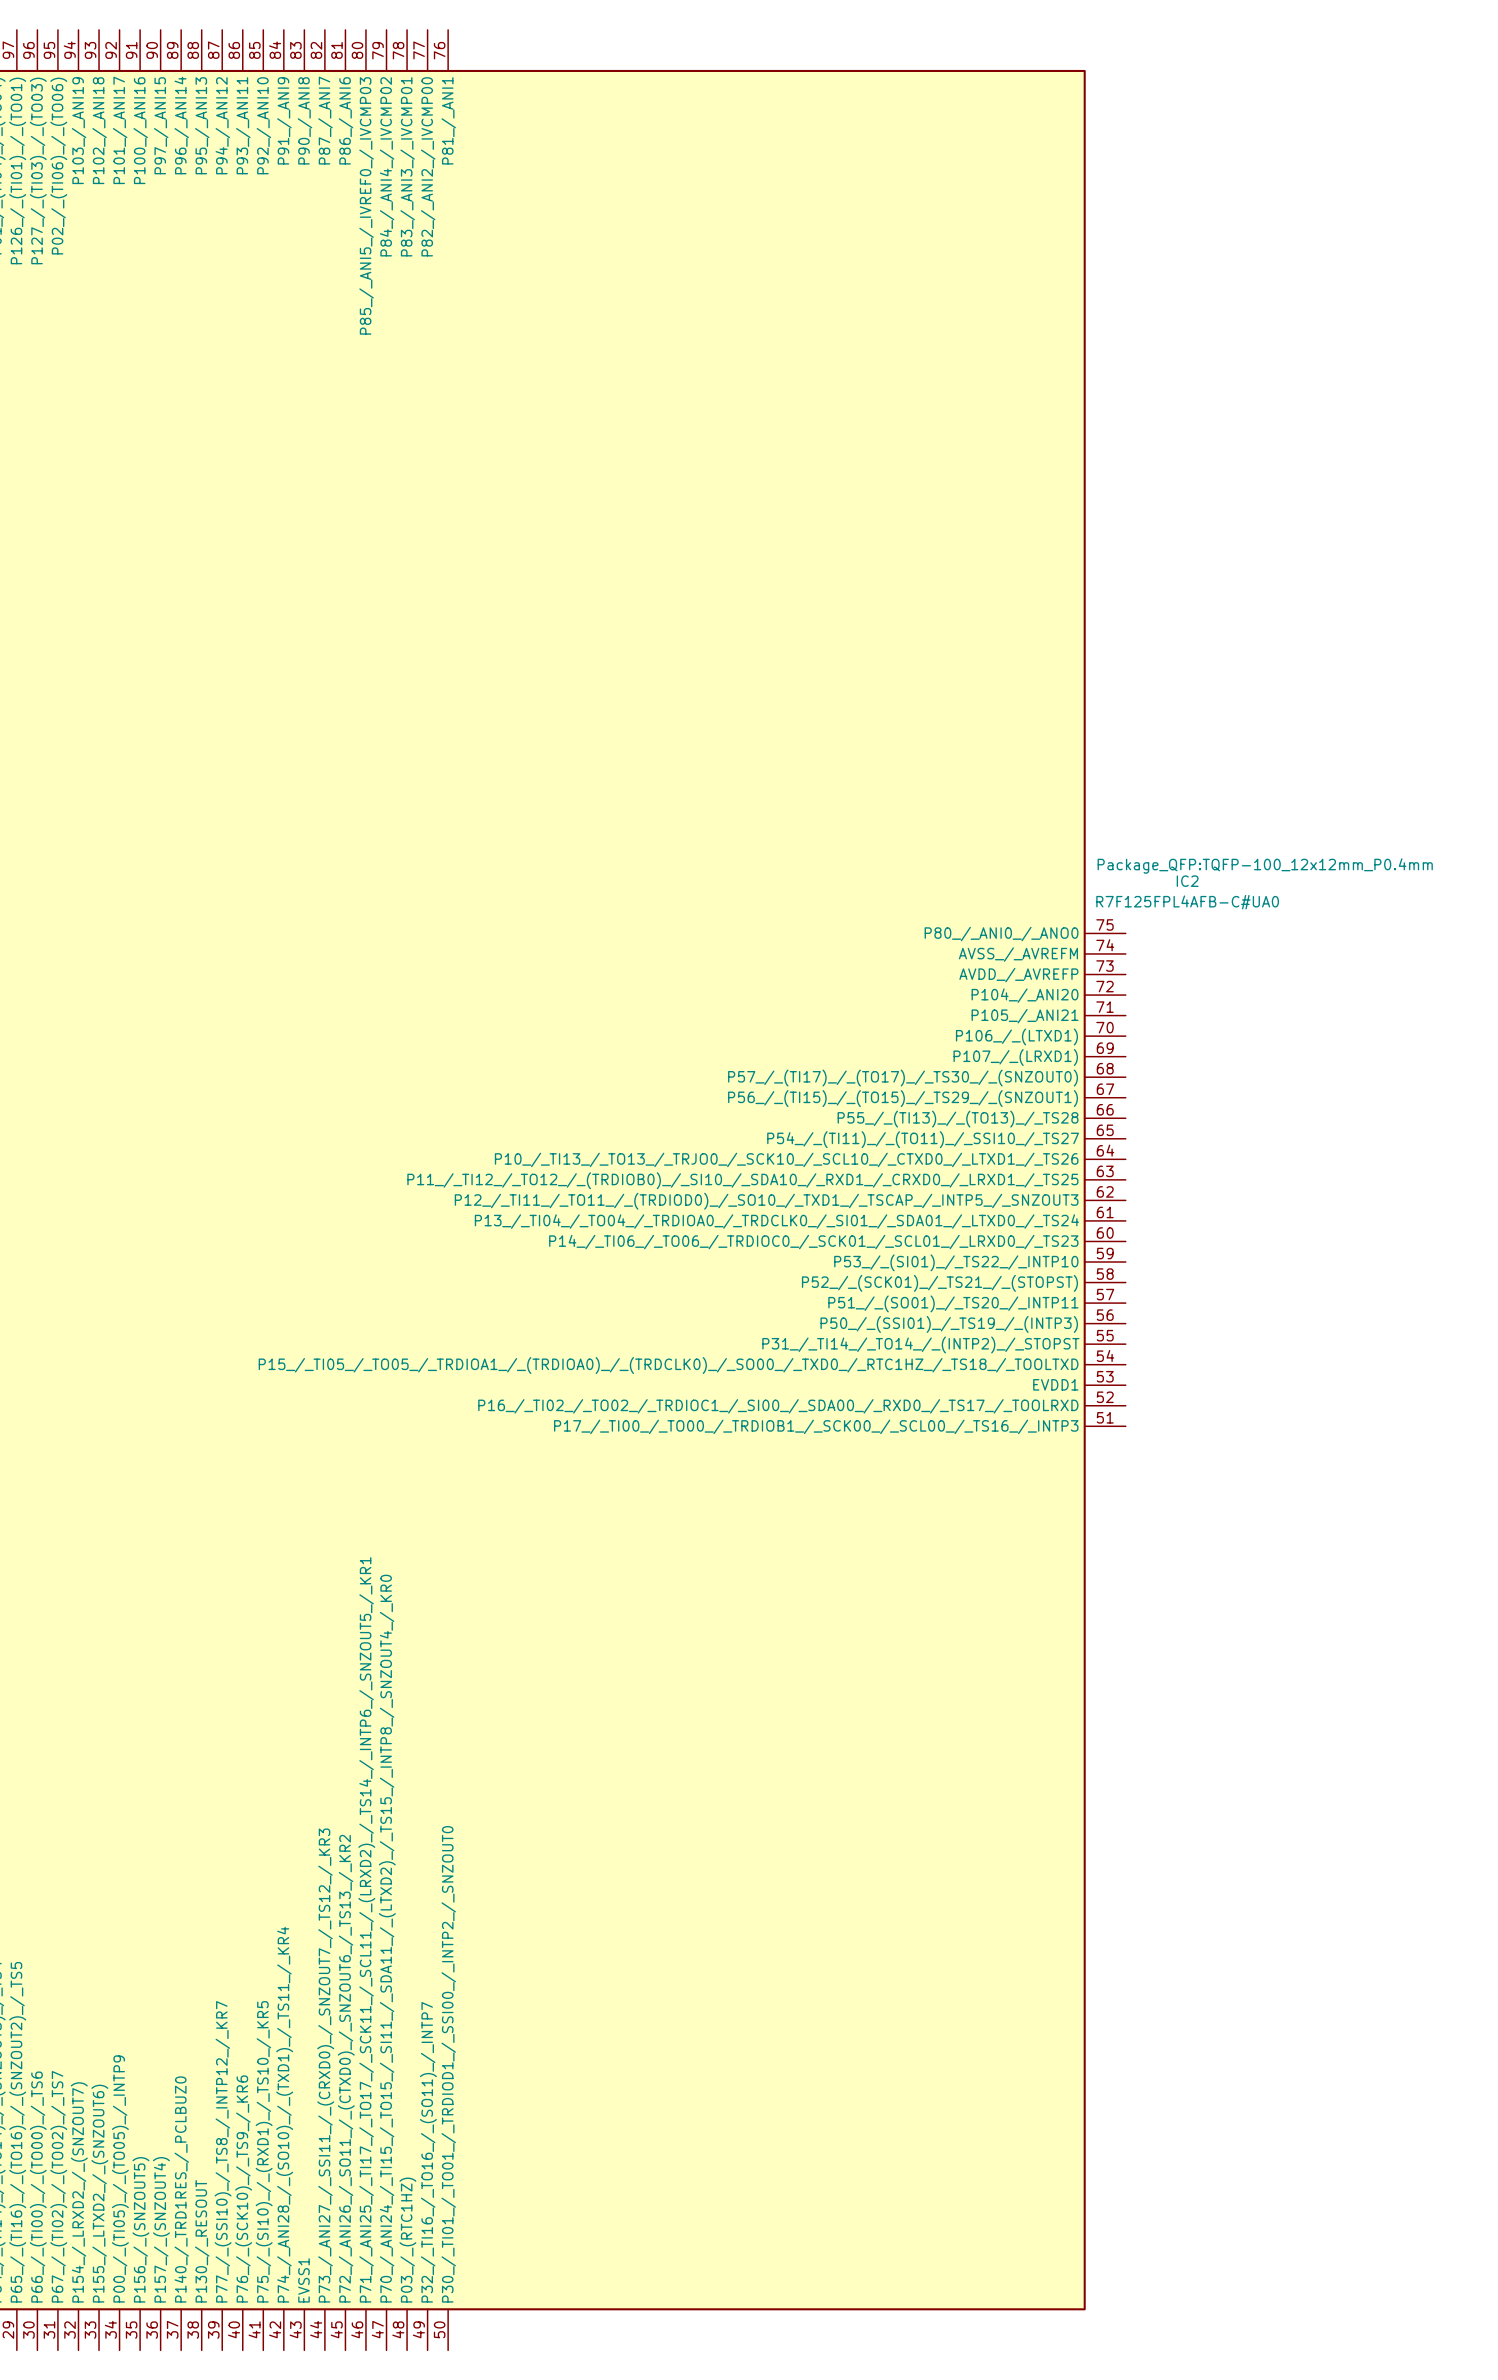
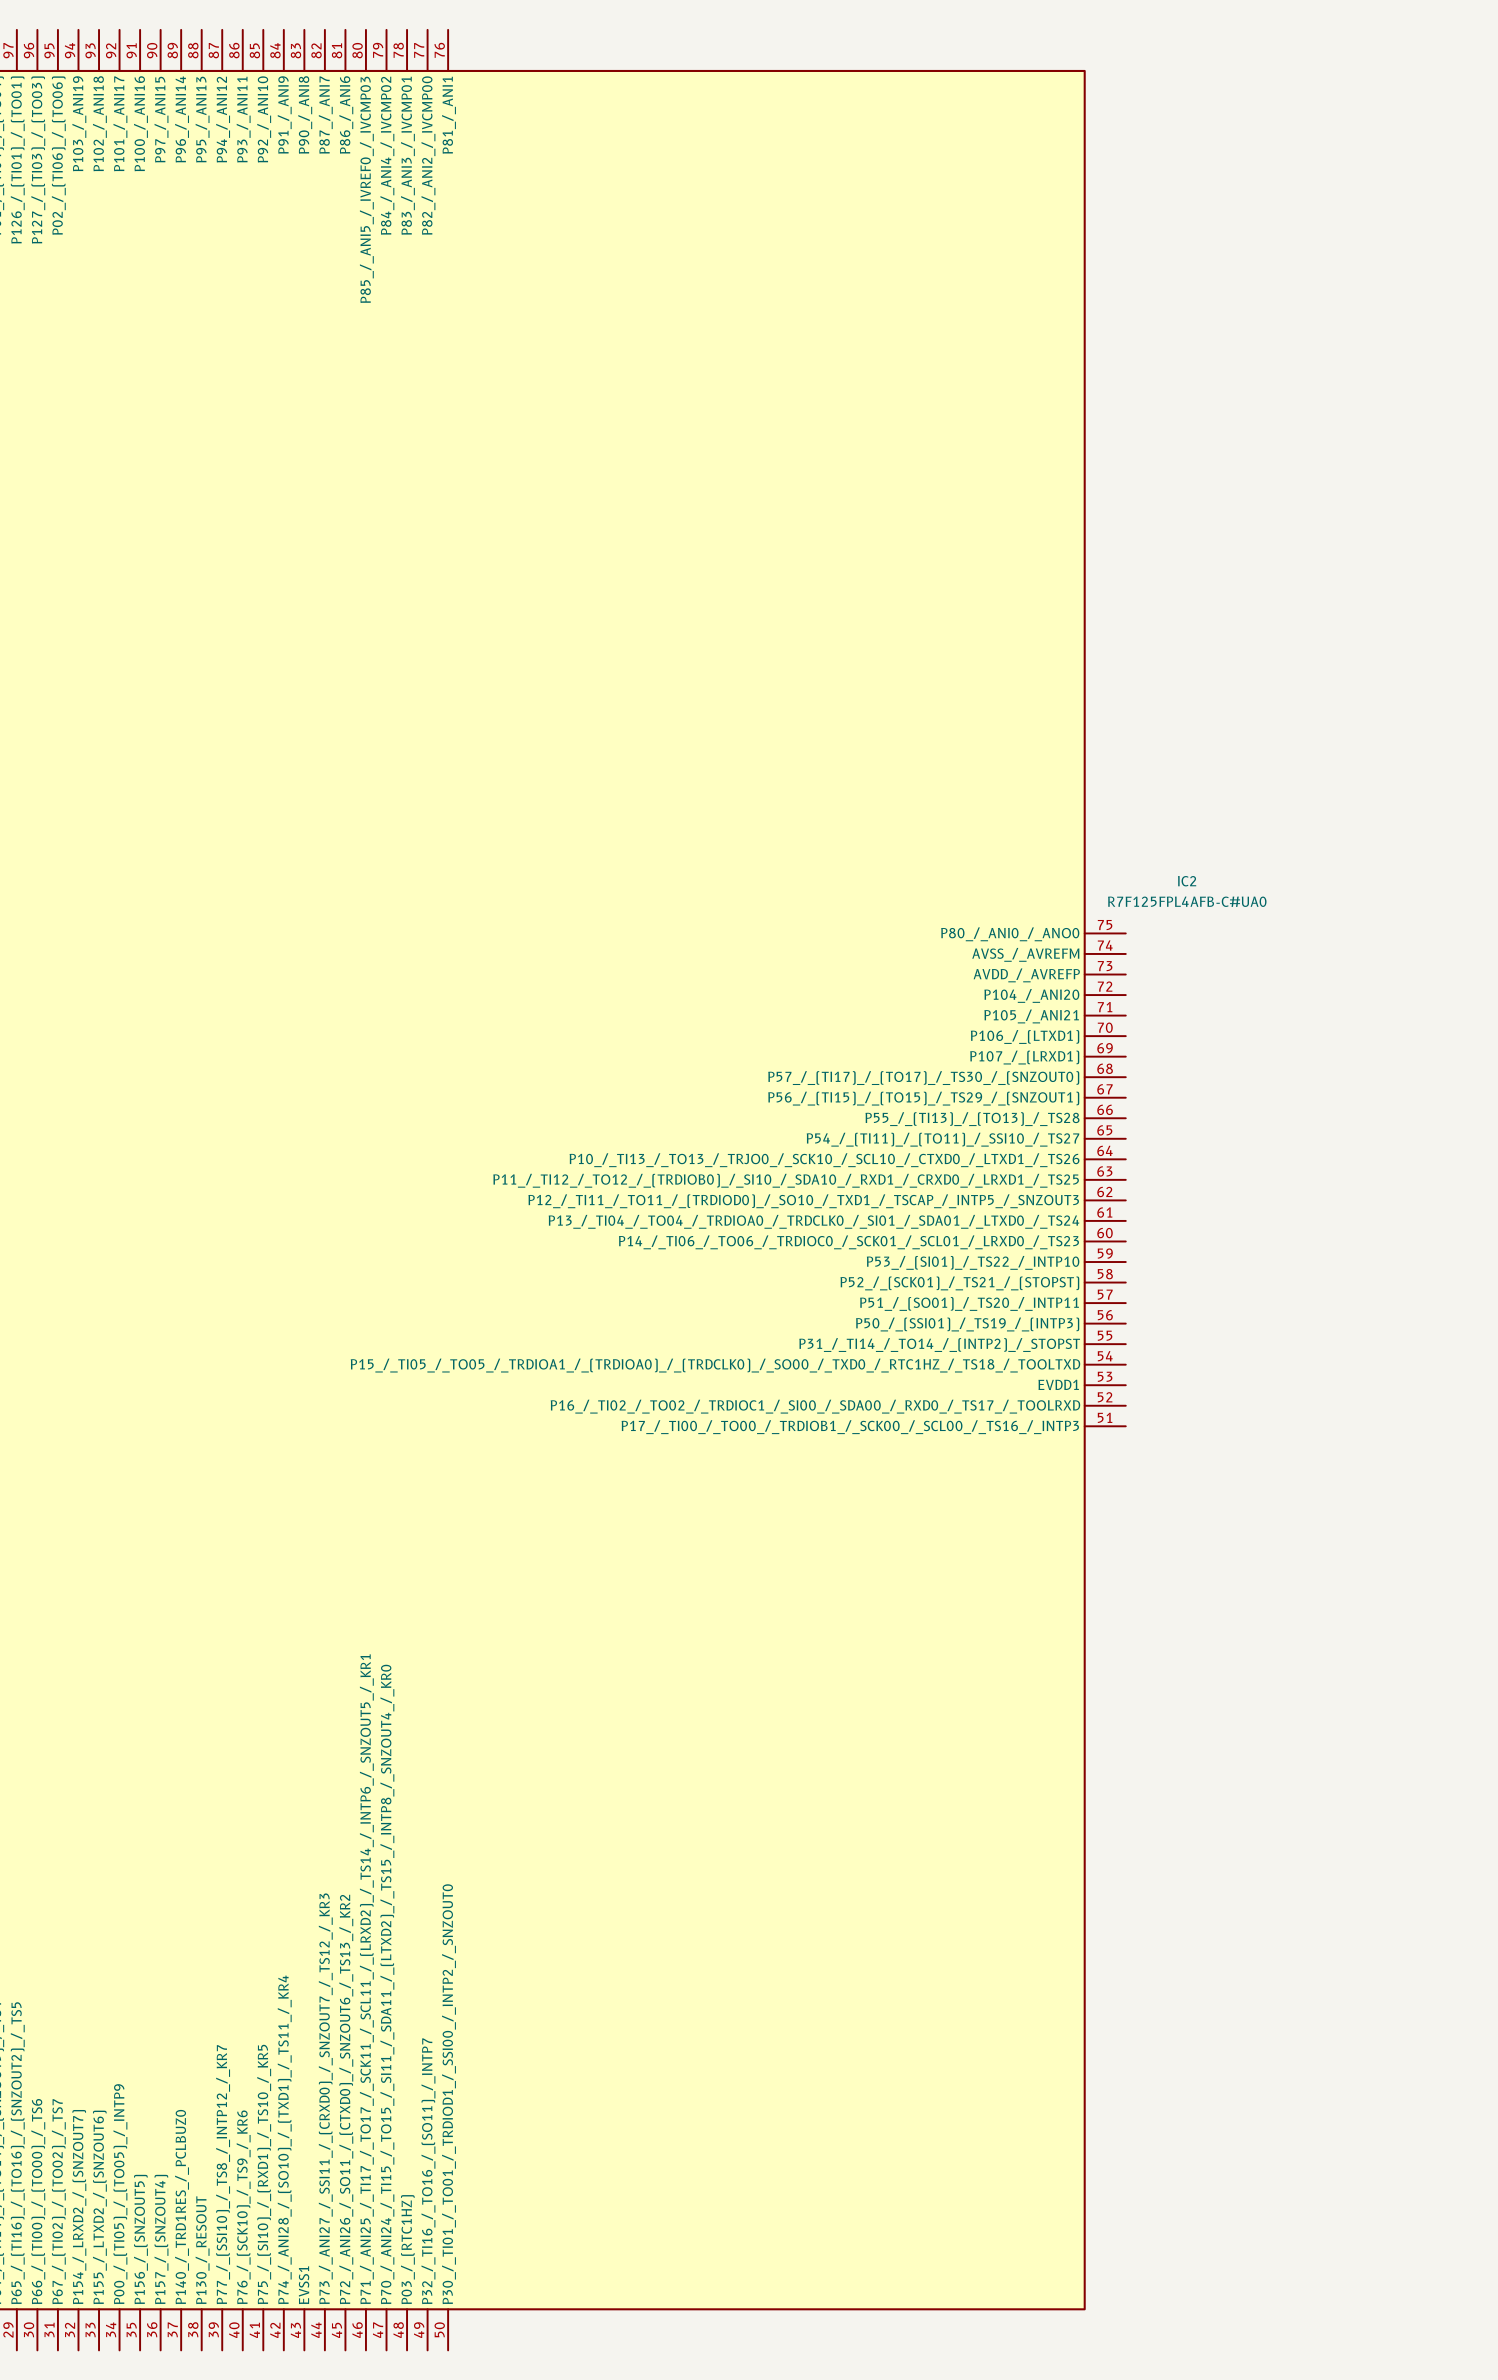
IC2 text: Package_QFP:TQFP-100_12x12mm_P0.4mm (1265, 865) -> none

